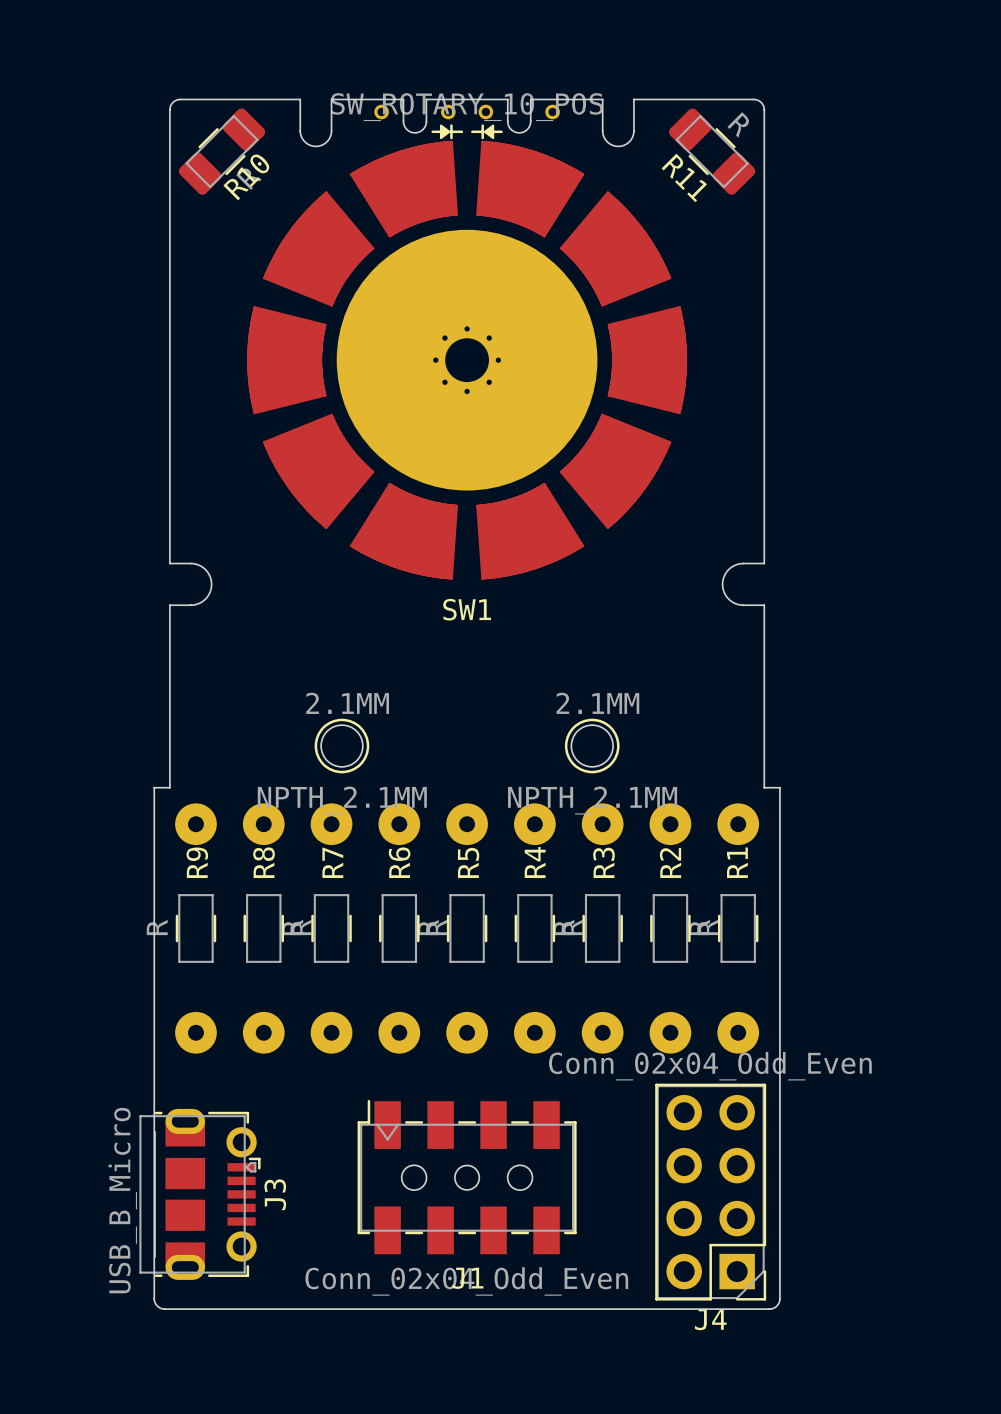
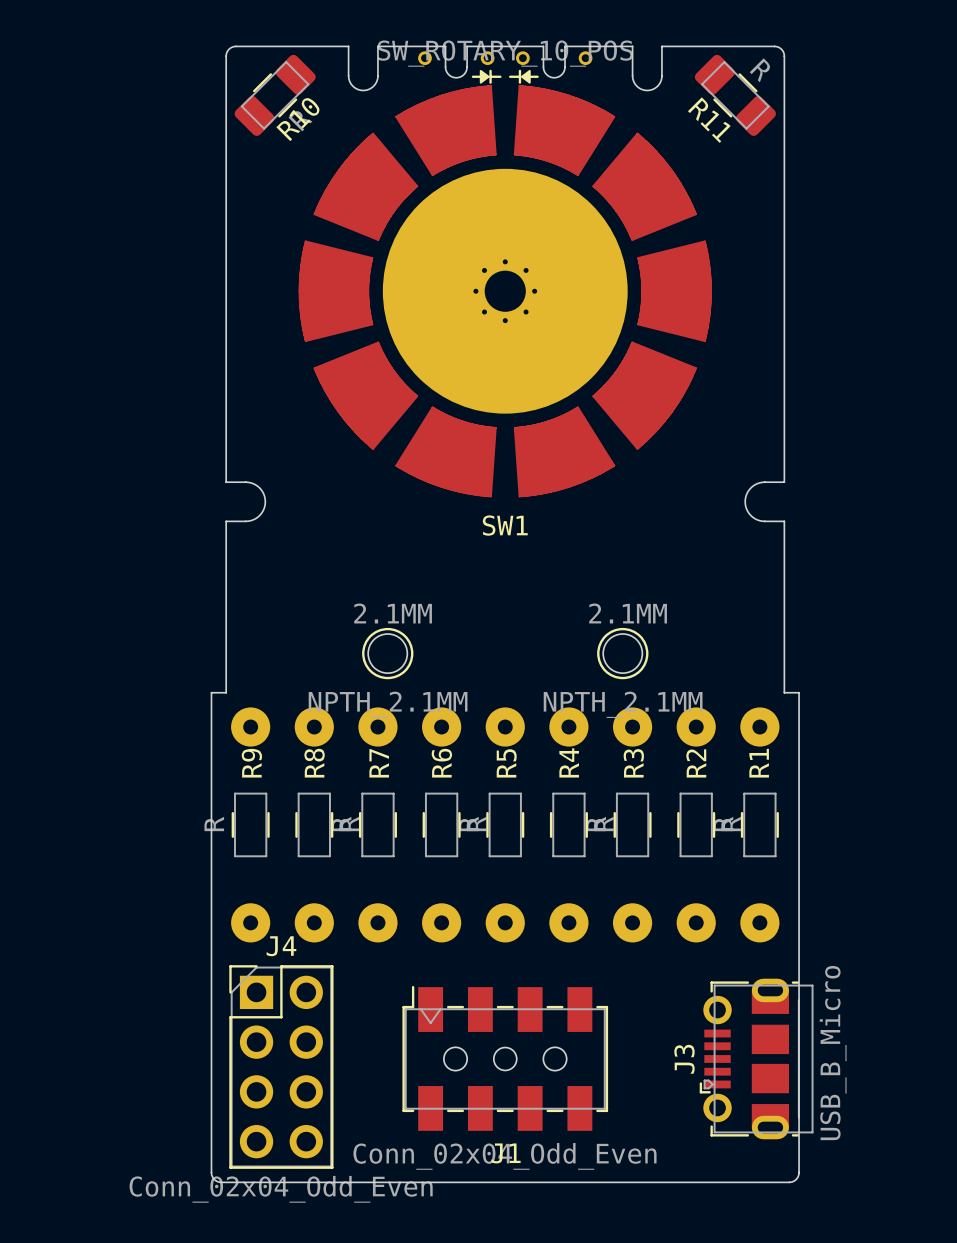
J4 rotation: 0° (710, 1192) -> 180° (281, 1067)
J4 position: (710, 1192) -> (281, 1067)
J3 rotation: 0° (199, 1194) -> 180° (756, 1058)
J3 position: (199, 1194) -> (756, 1058)

